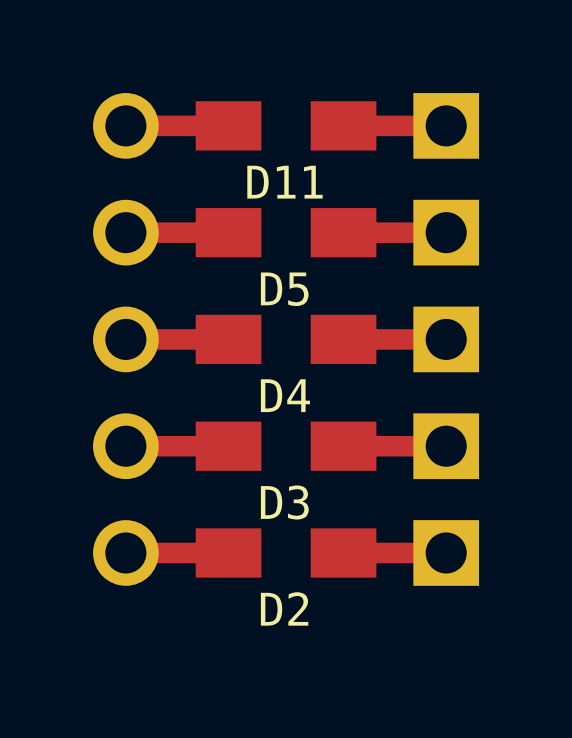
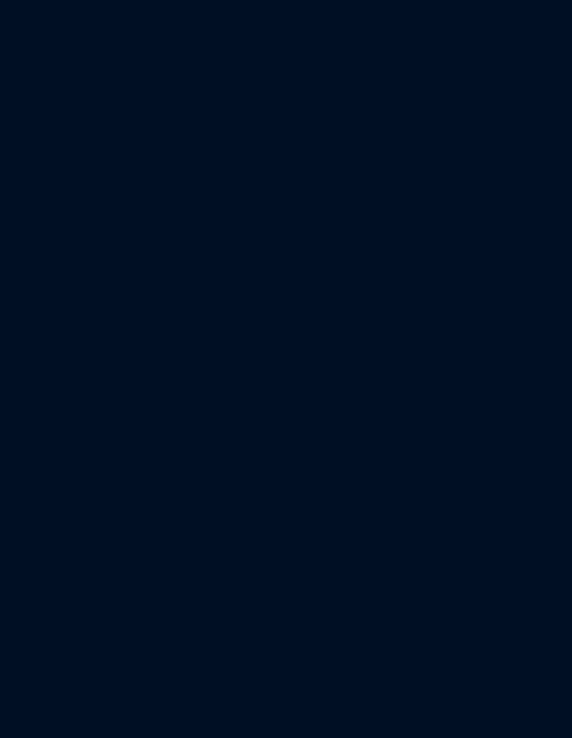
D11: (286, 125) -> none
D5: (286, 232) -> none
D4: (286, 339) -> none
D3: (286, 446) -> none
D2: (286, 552) -> none

